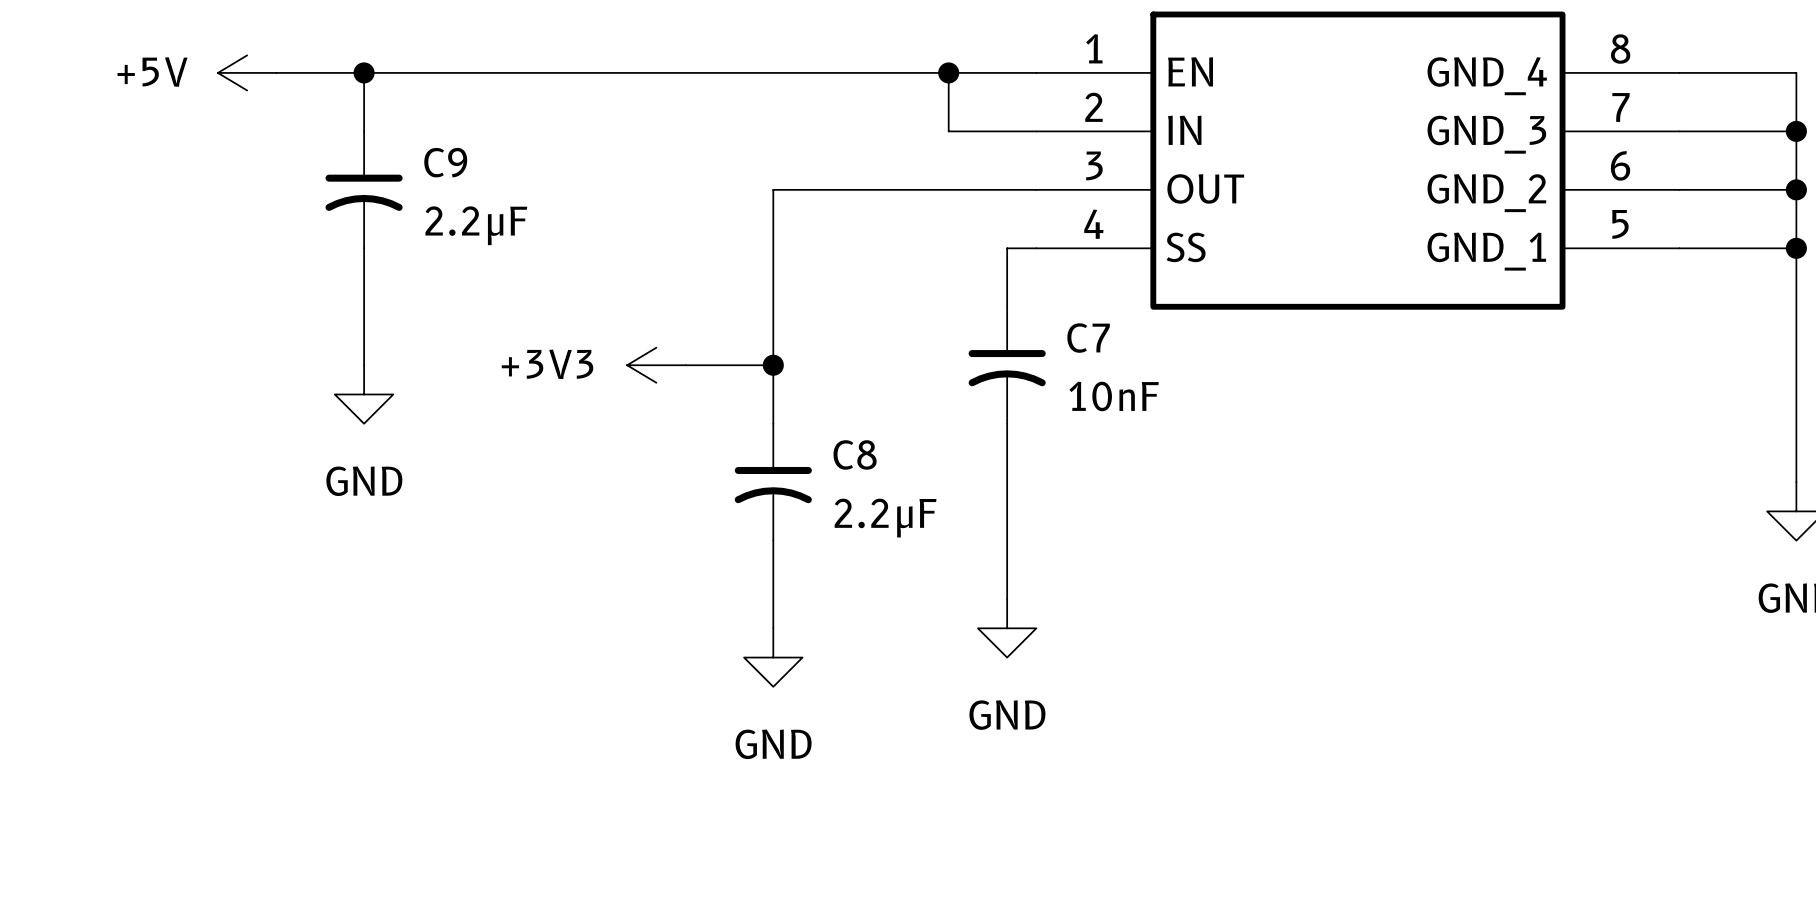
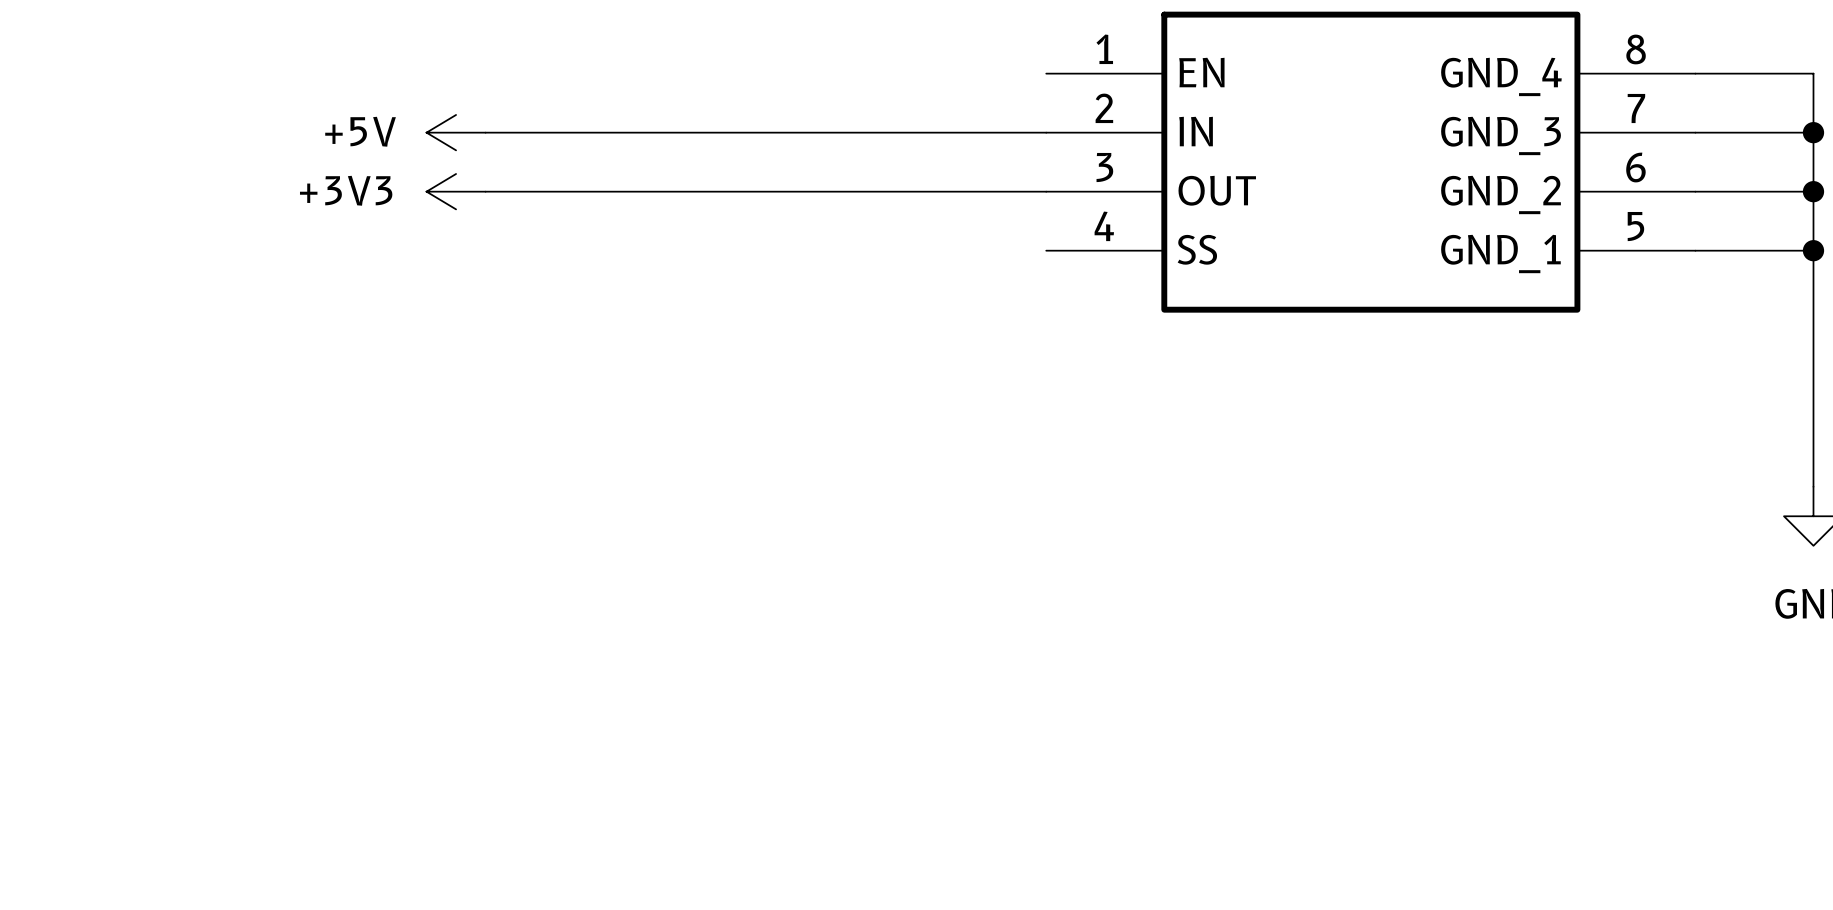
power symbol position: +5V (247, 72) -> +5V (456, 132)
wire: (276, 72) (1036, 72) -> none
wire: (364, 72) (364, 131) -> none
junction: (364, 72) -> none
wire: (948, 72) (948, 131) -> (485, 132) (957, 132)
junction: (948, 72) -> none
C9: 2.2μF (364, 189) -> none
wire: (773, 189) (773, 423) -> (780, 191) (485, 191)
wire: (364, 248) (364, 365) -> none
wire: (1036, 248) (1007, 248) (1007, 306) -> none
power symbol position: +3V3 (656, 365) -> +3V3 (456, 191)
wire: (685, 365) (773, 365) -> none
junction: (773, 365) -> none
C7: 10nF (1007, 365) -> none
power symbol: GND (364, 394) -> none
wire: (1007, 423) (1007, 599) -> none
C8: 2.2μF (773, 482) -> none
wire: (773, 540) (773, 628) -> none
power symbol: GND (1007, 628) -> none
power symbol: GND (773, 657) -> none

